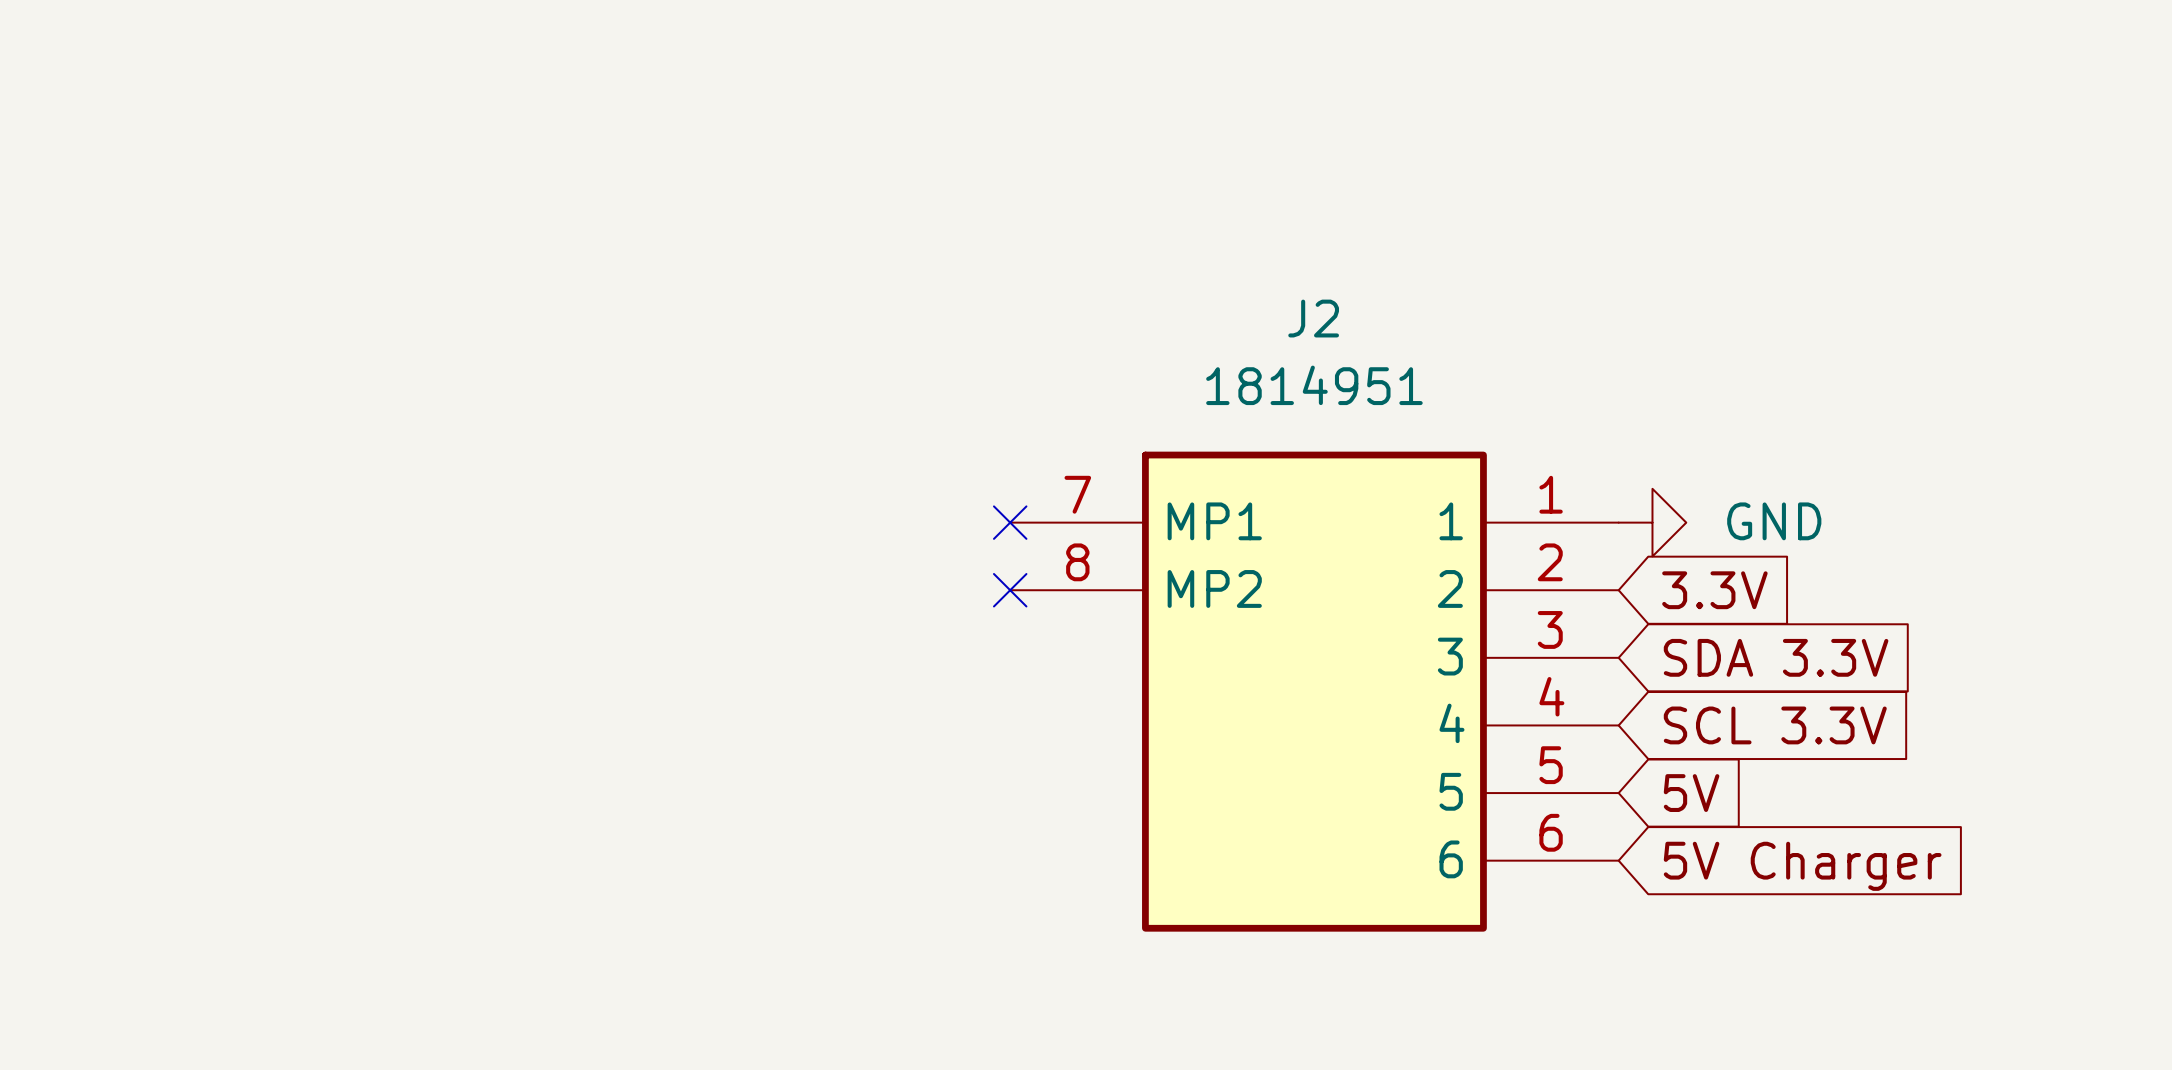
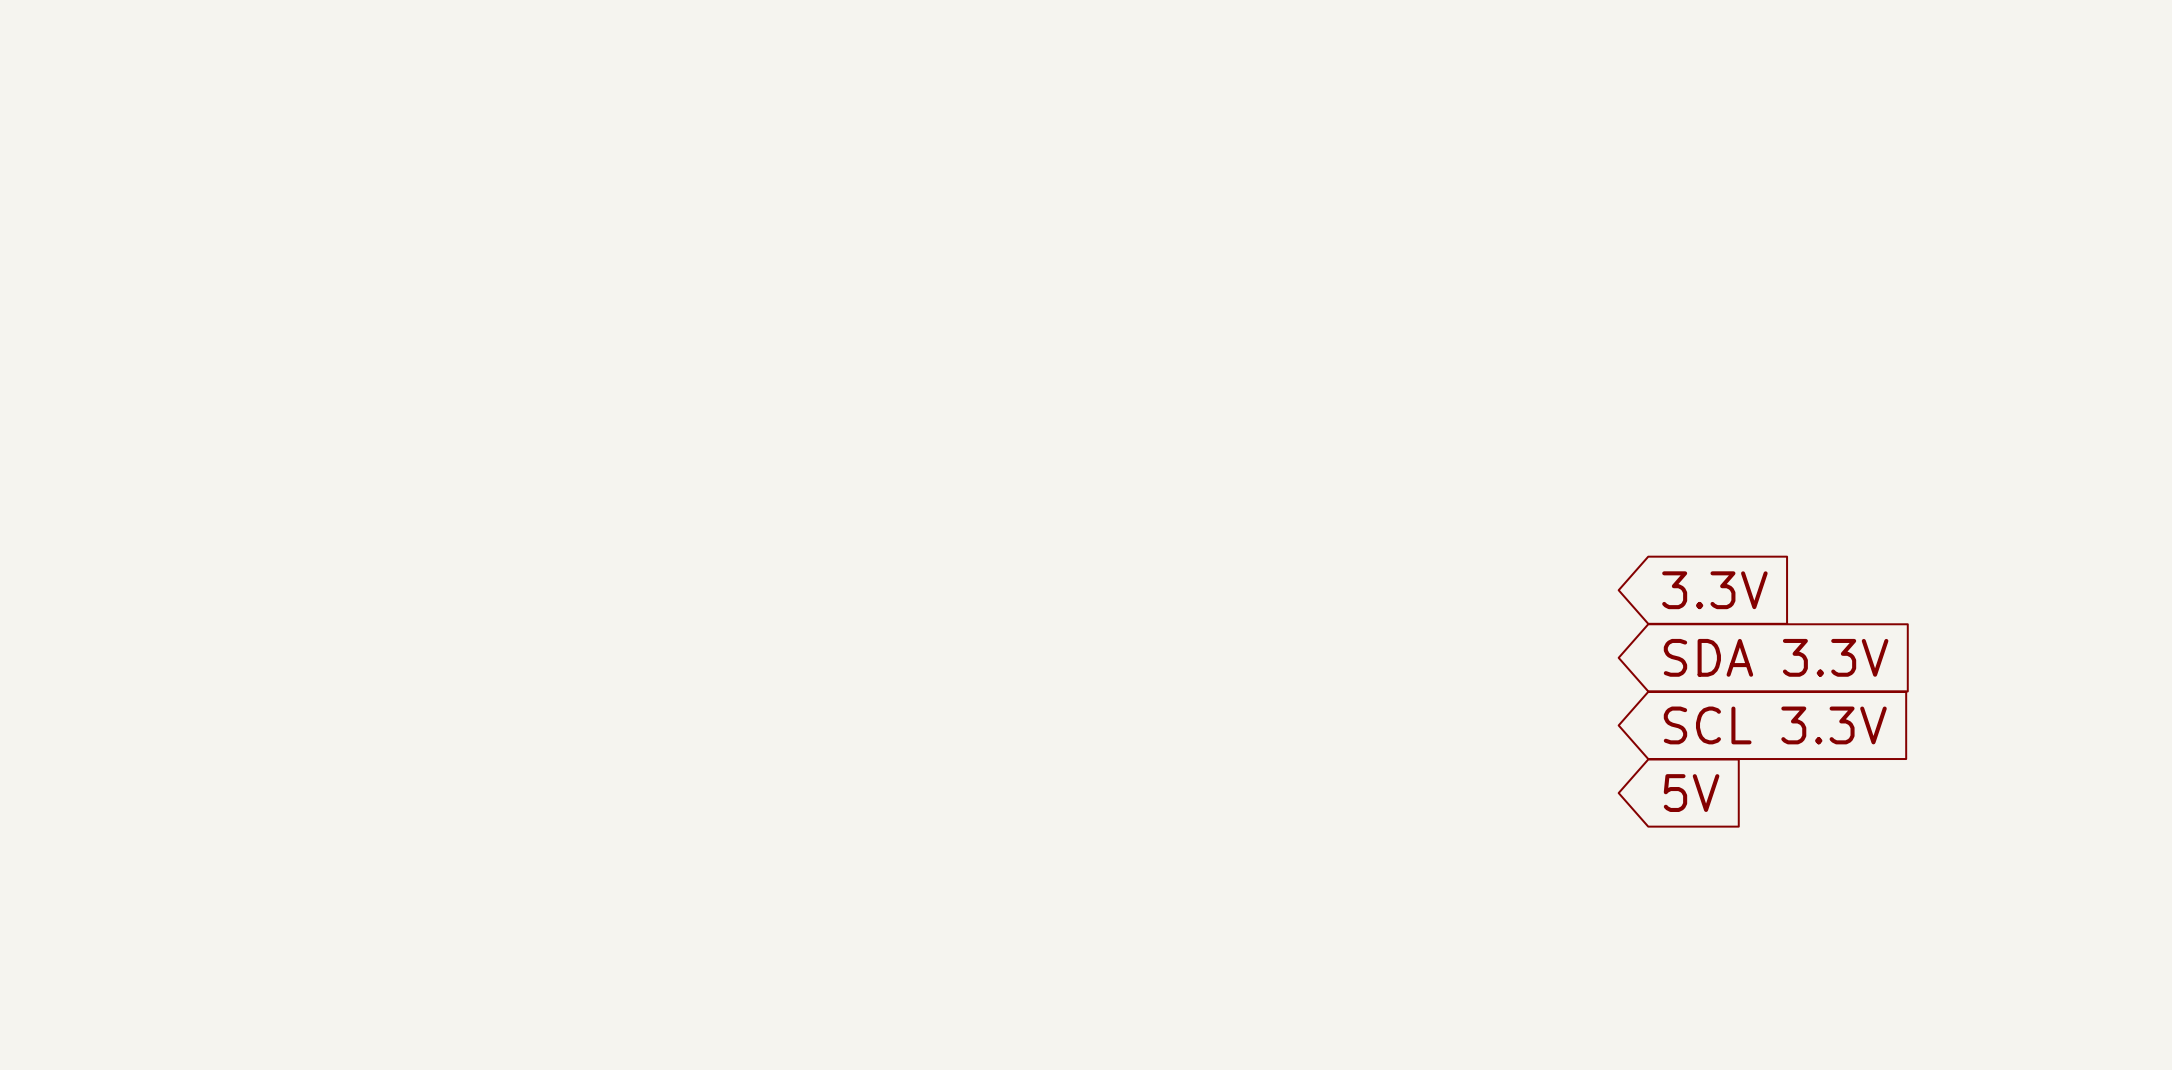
no-connect mark: (1010, 522) -> none
power symbol: GND (1652, 522) -> none
no-connect mark: (1010, 590) -> none
J2: 1814951 (1314, 691) -> none
global label: 5V Charger (1802, 866) -> none

